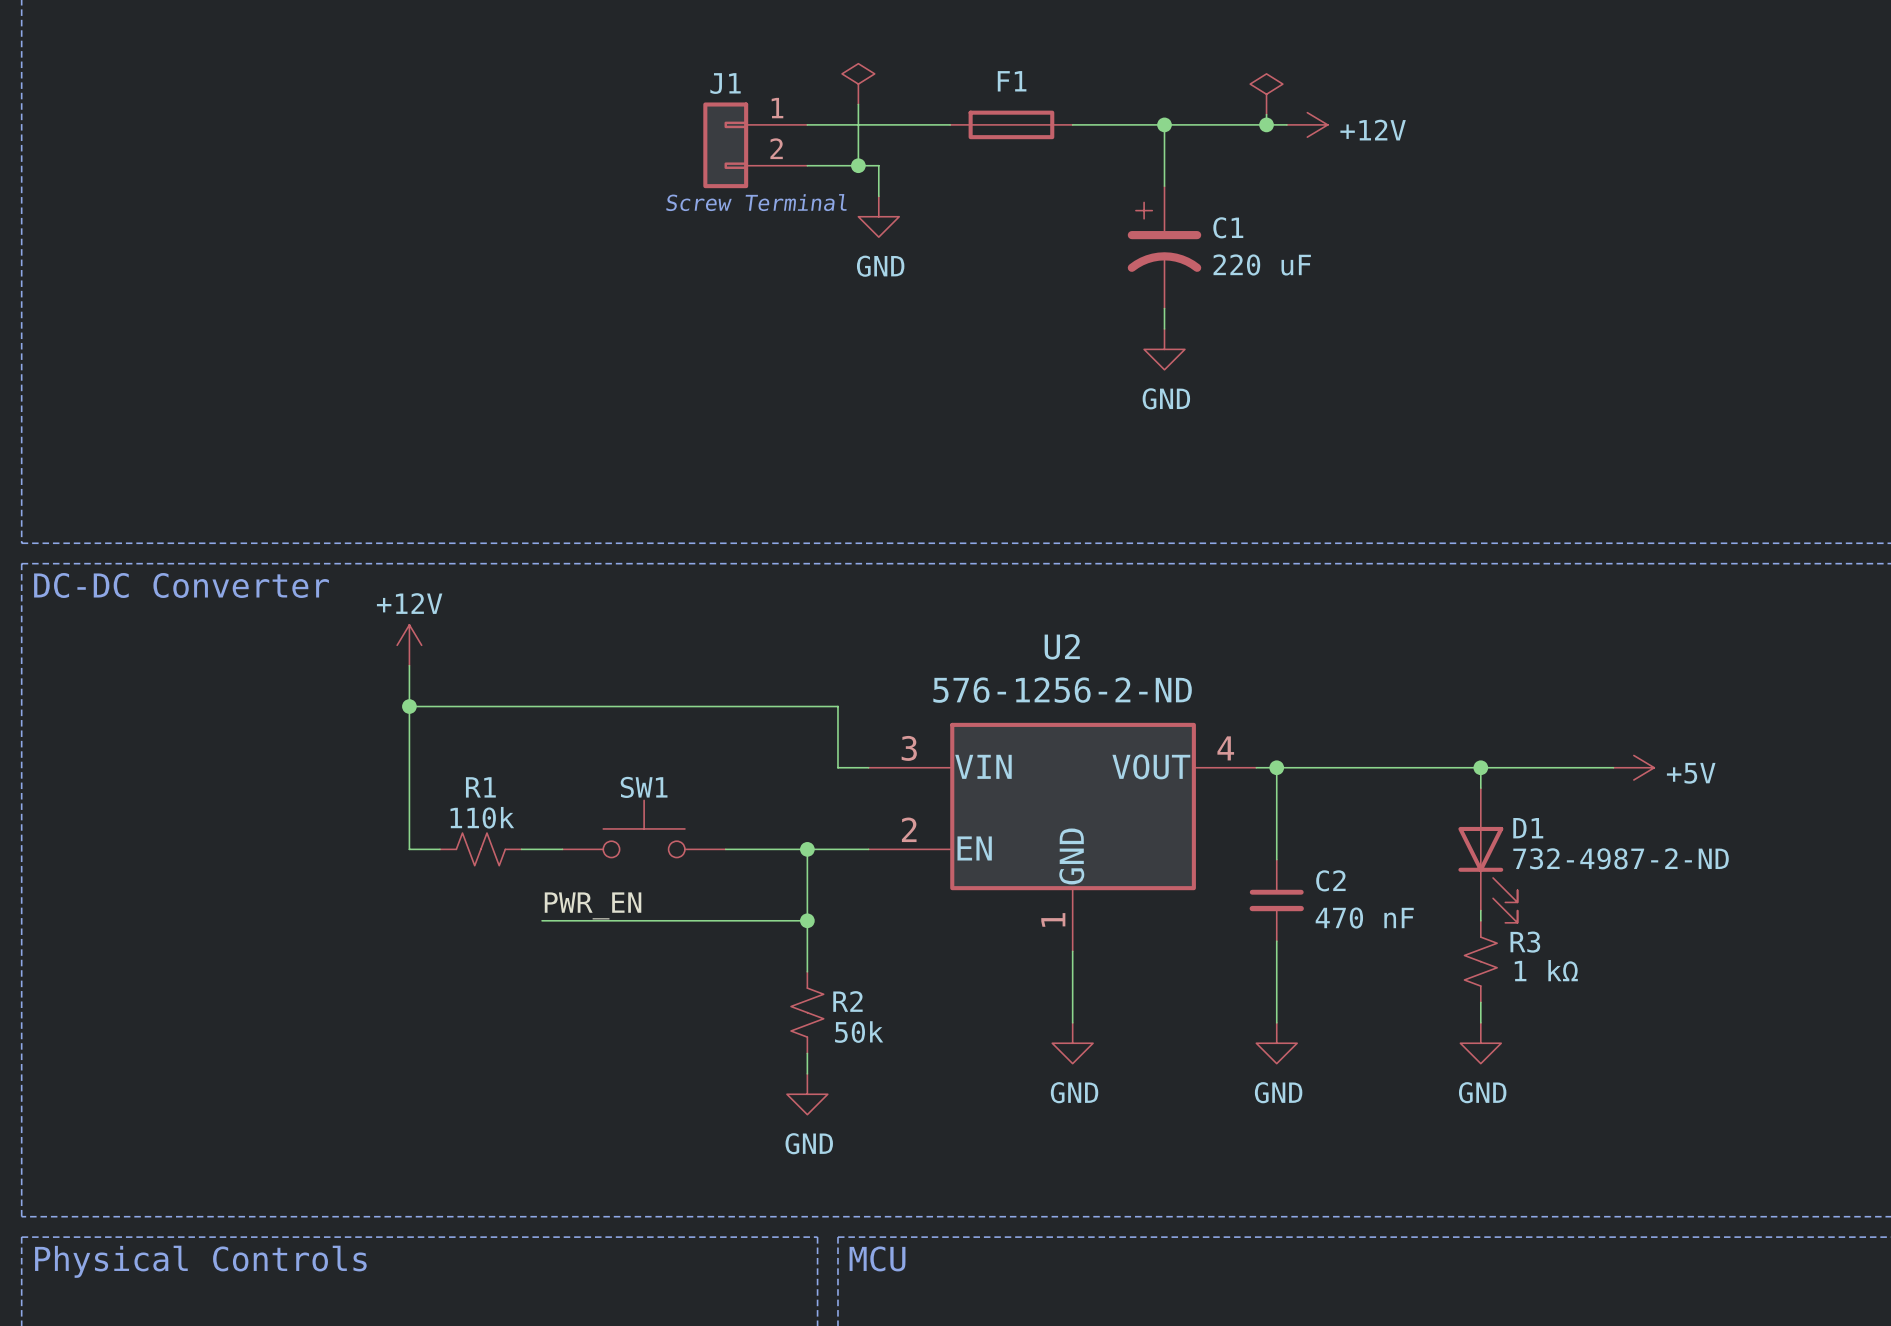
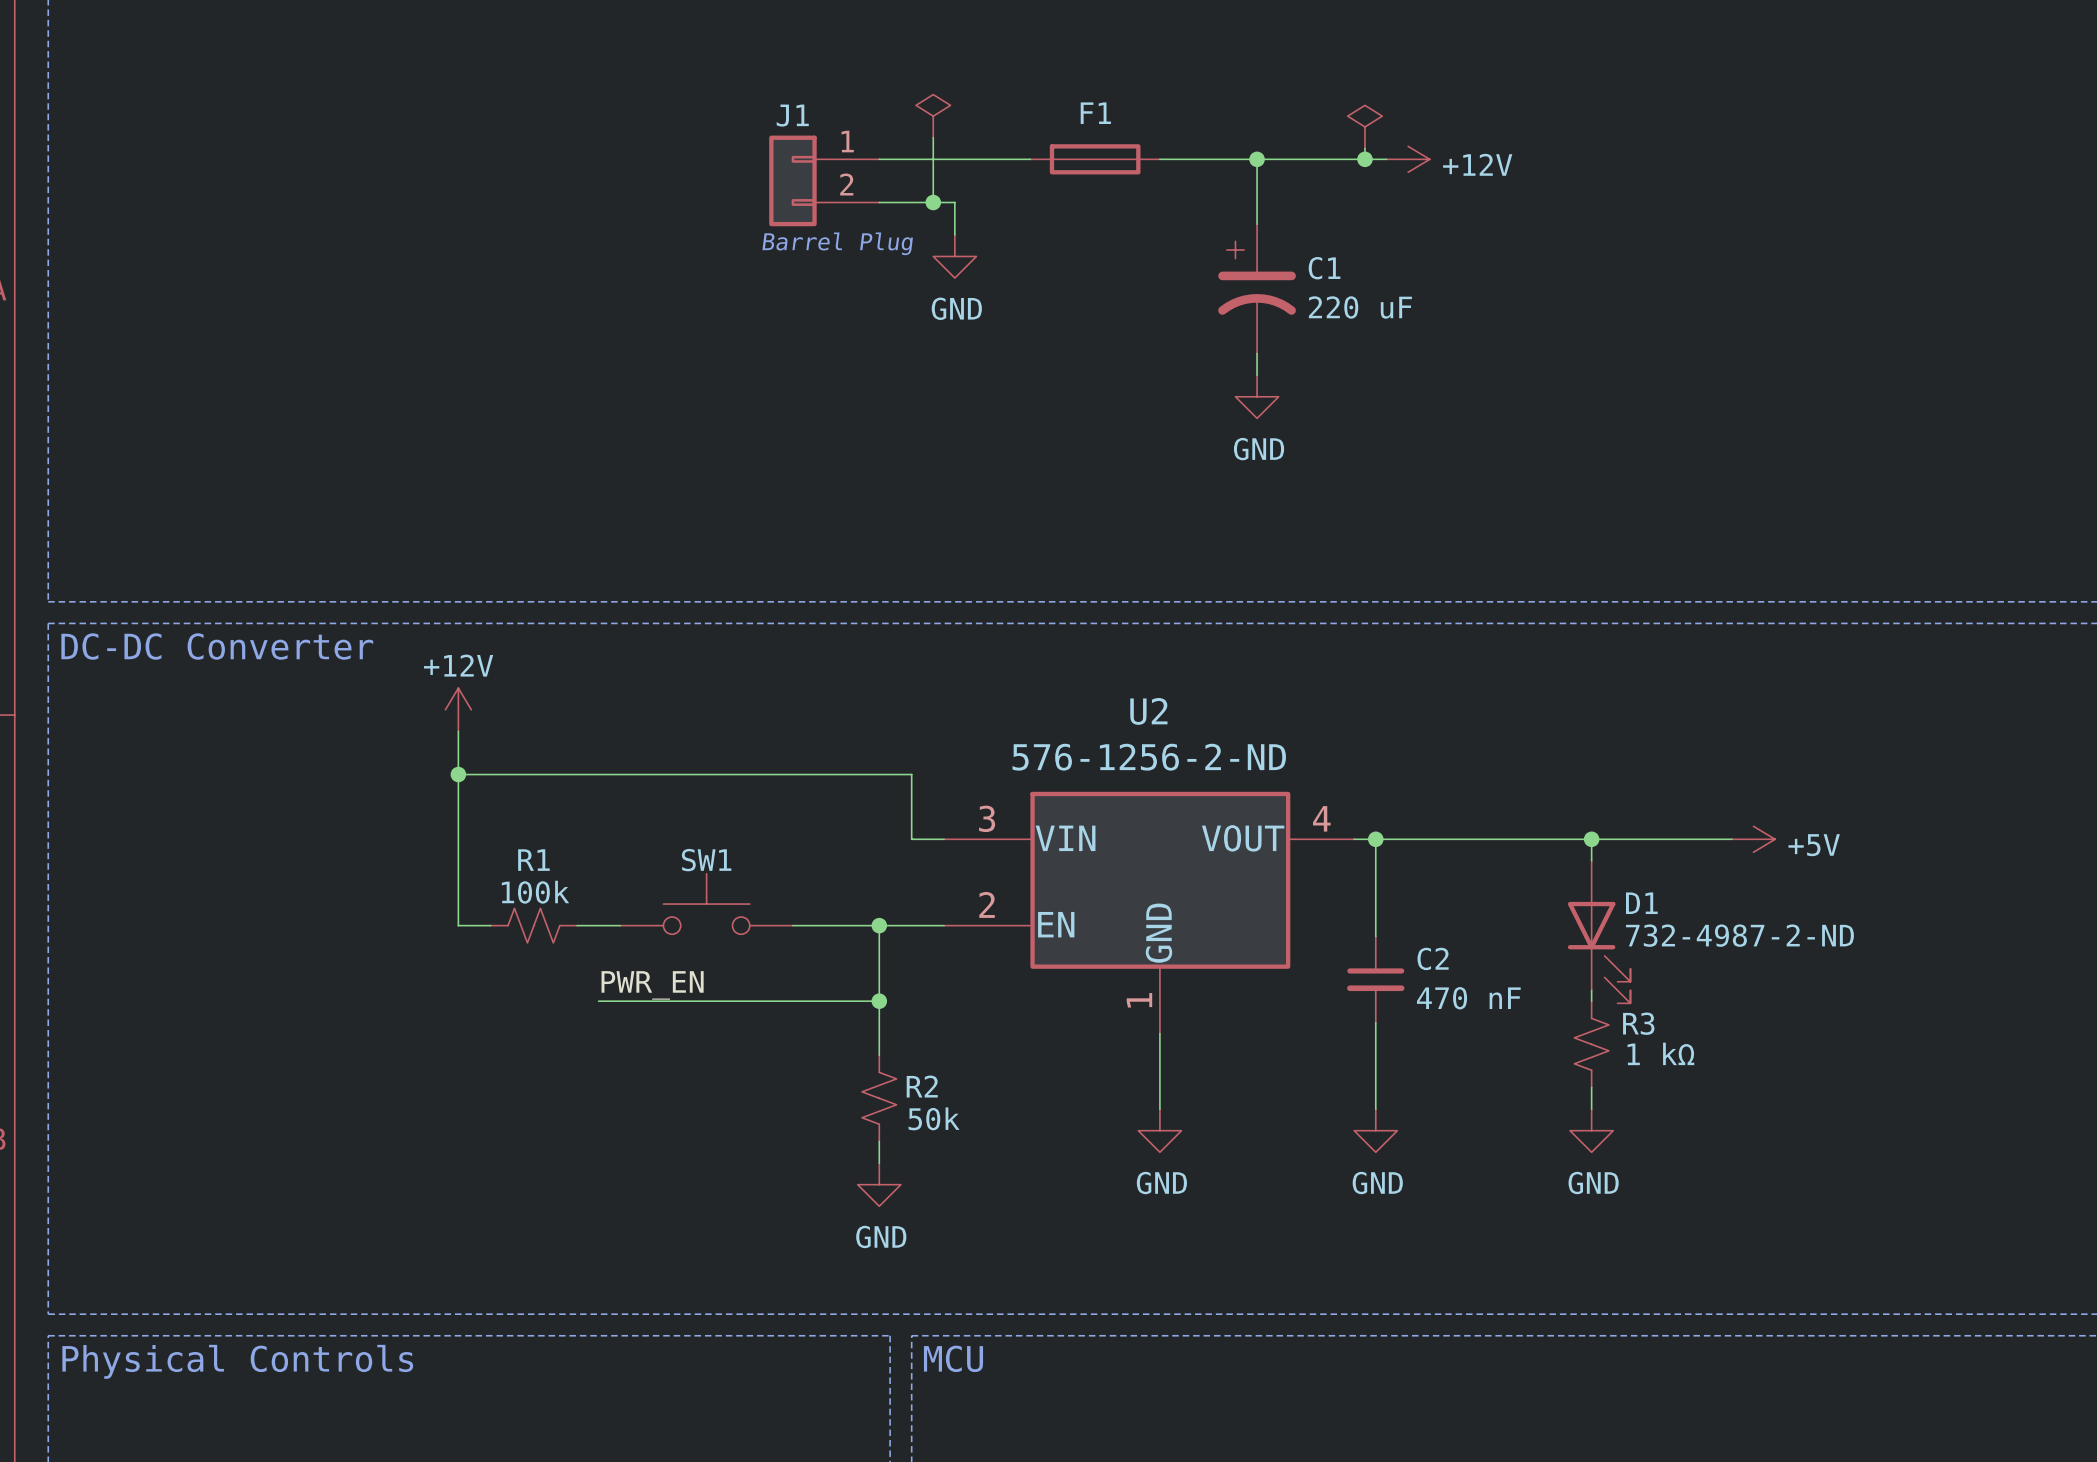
text: Screw Terminal (756, 202) -> none
text: none -> Barrel Plug (837, 243)
R1 value: 110k (482, 817) -> 100k (535, 892)

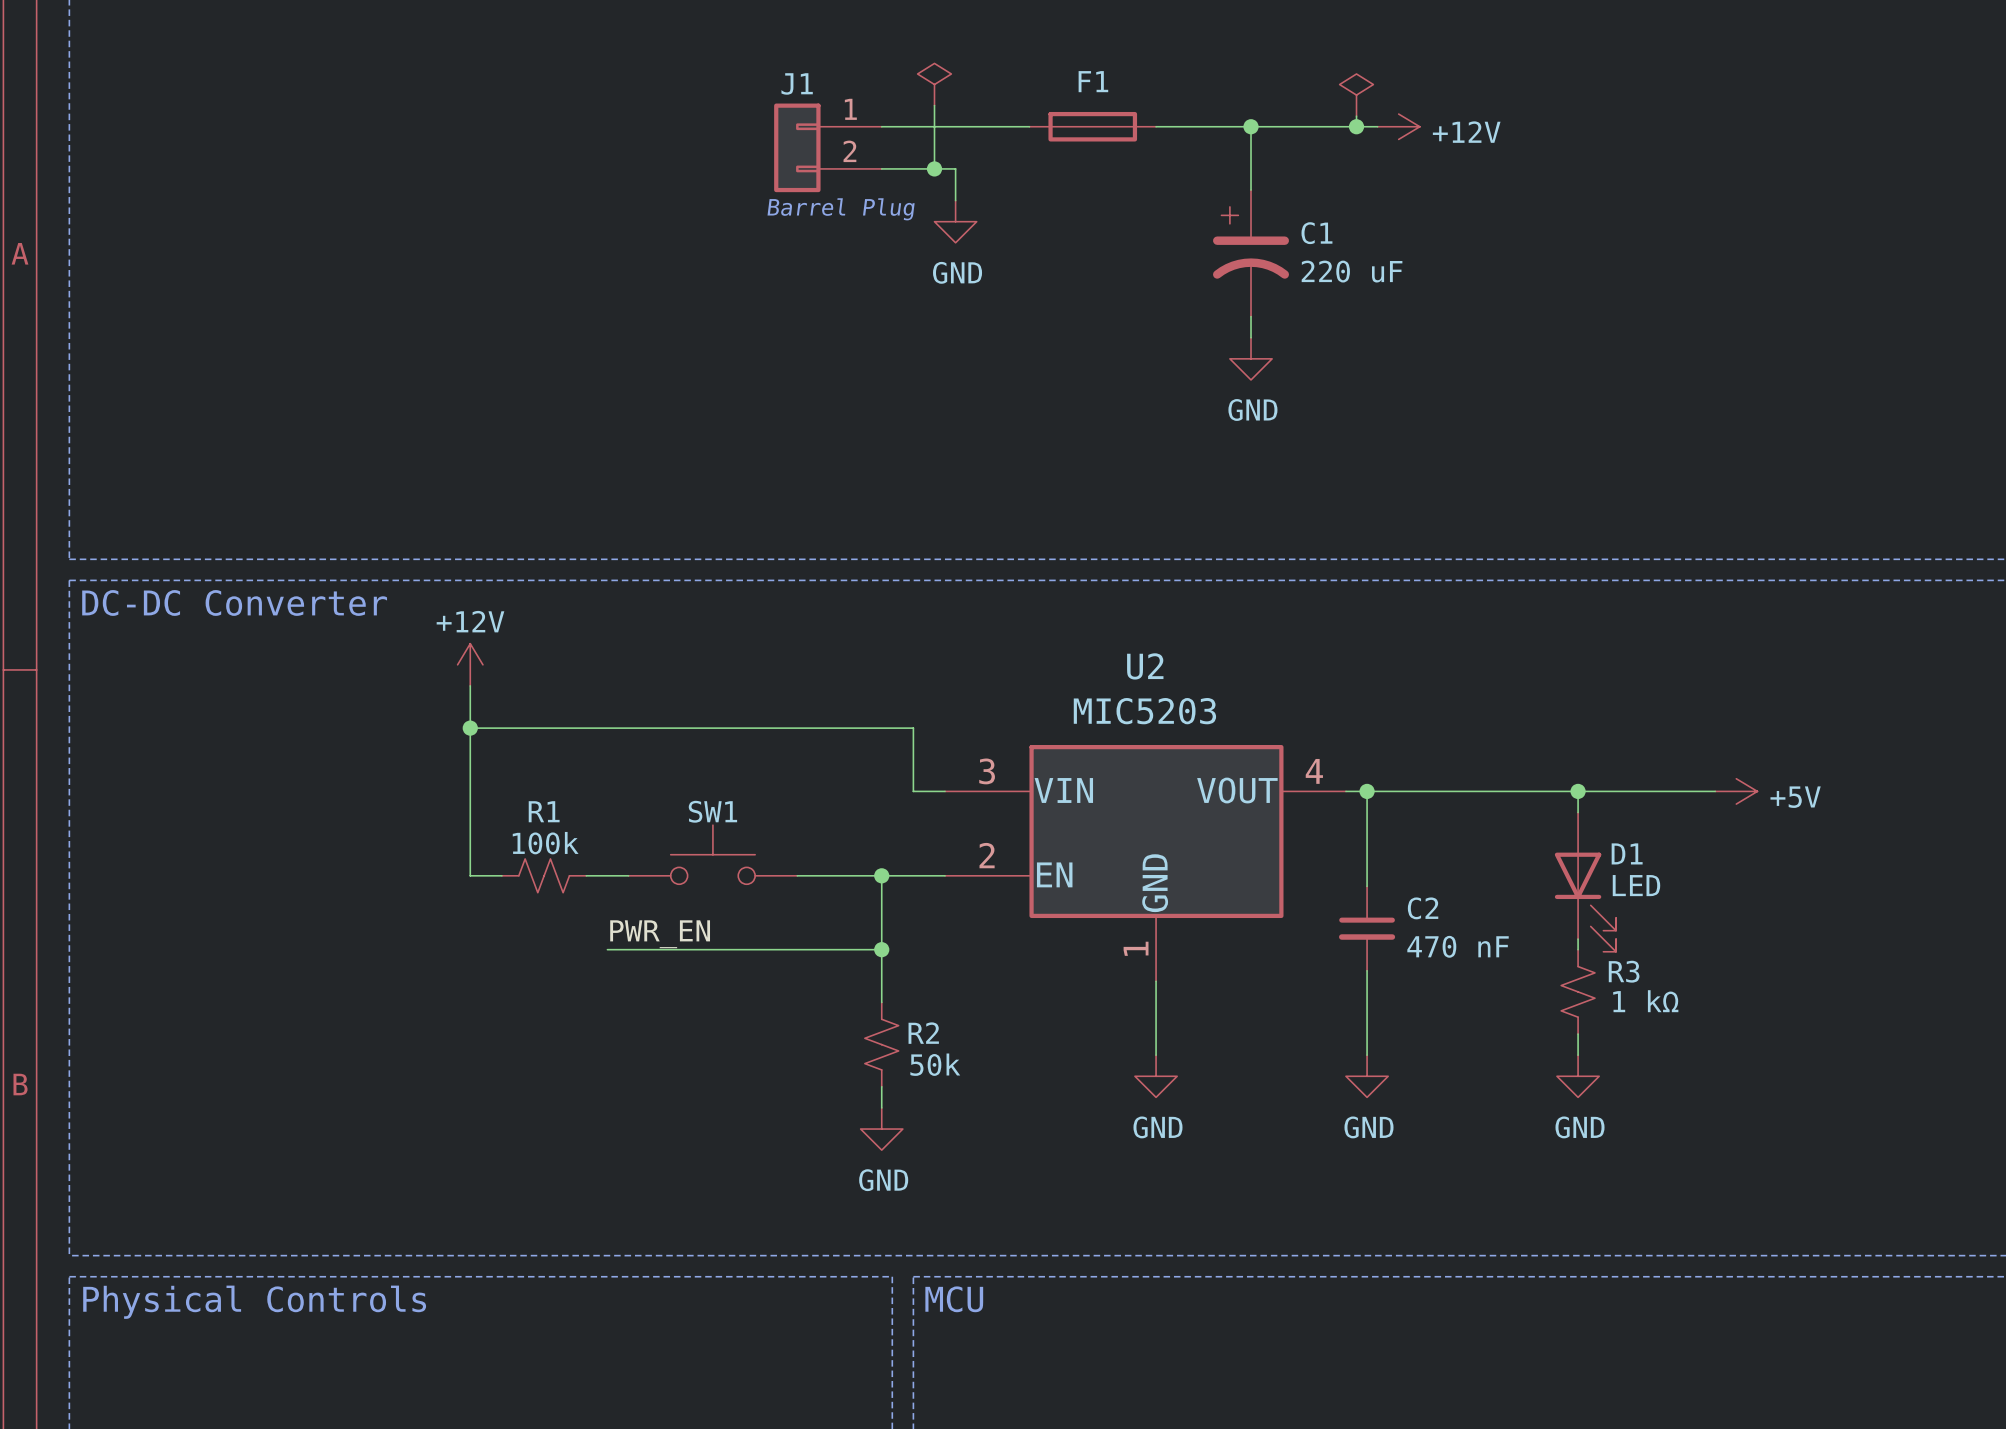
U2 value: 576-1256-2-ND (1149, 757) -> MIC5203 (1144, 711)
D1 value: 732-4987-2-ND (1739, 935) -> LED (1636, 885)

